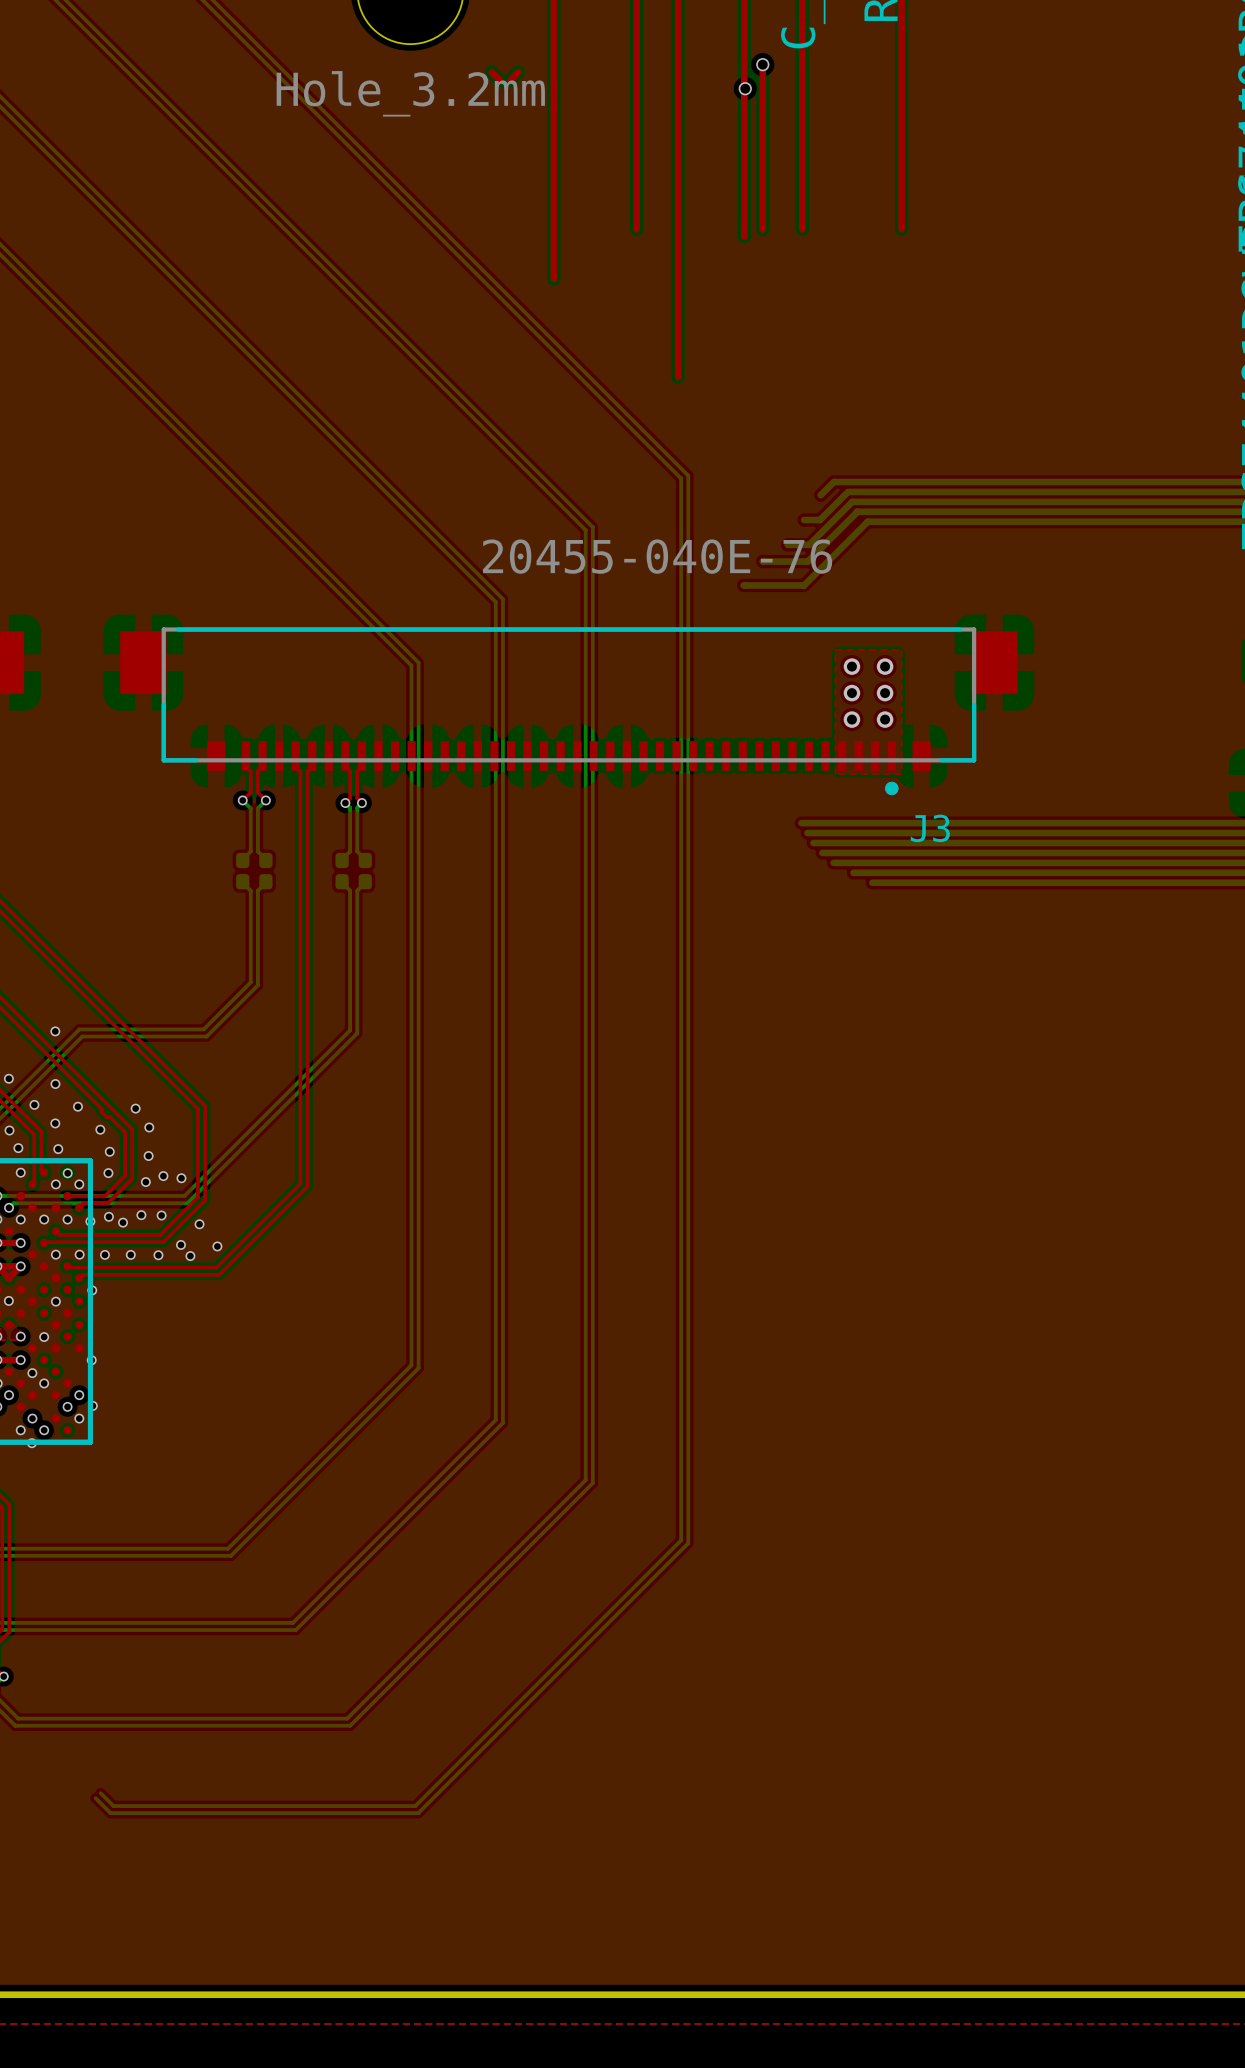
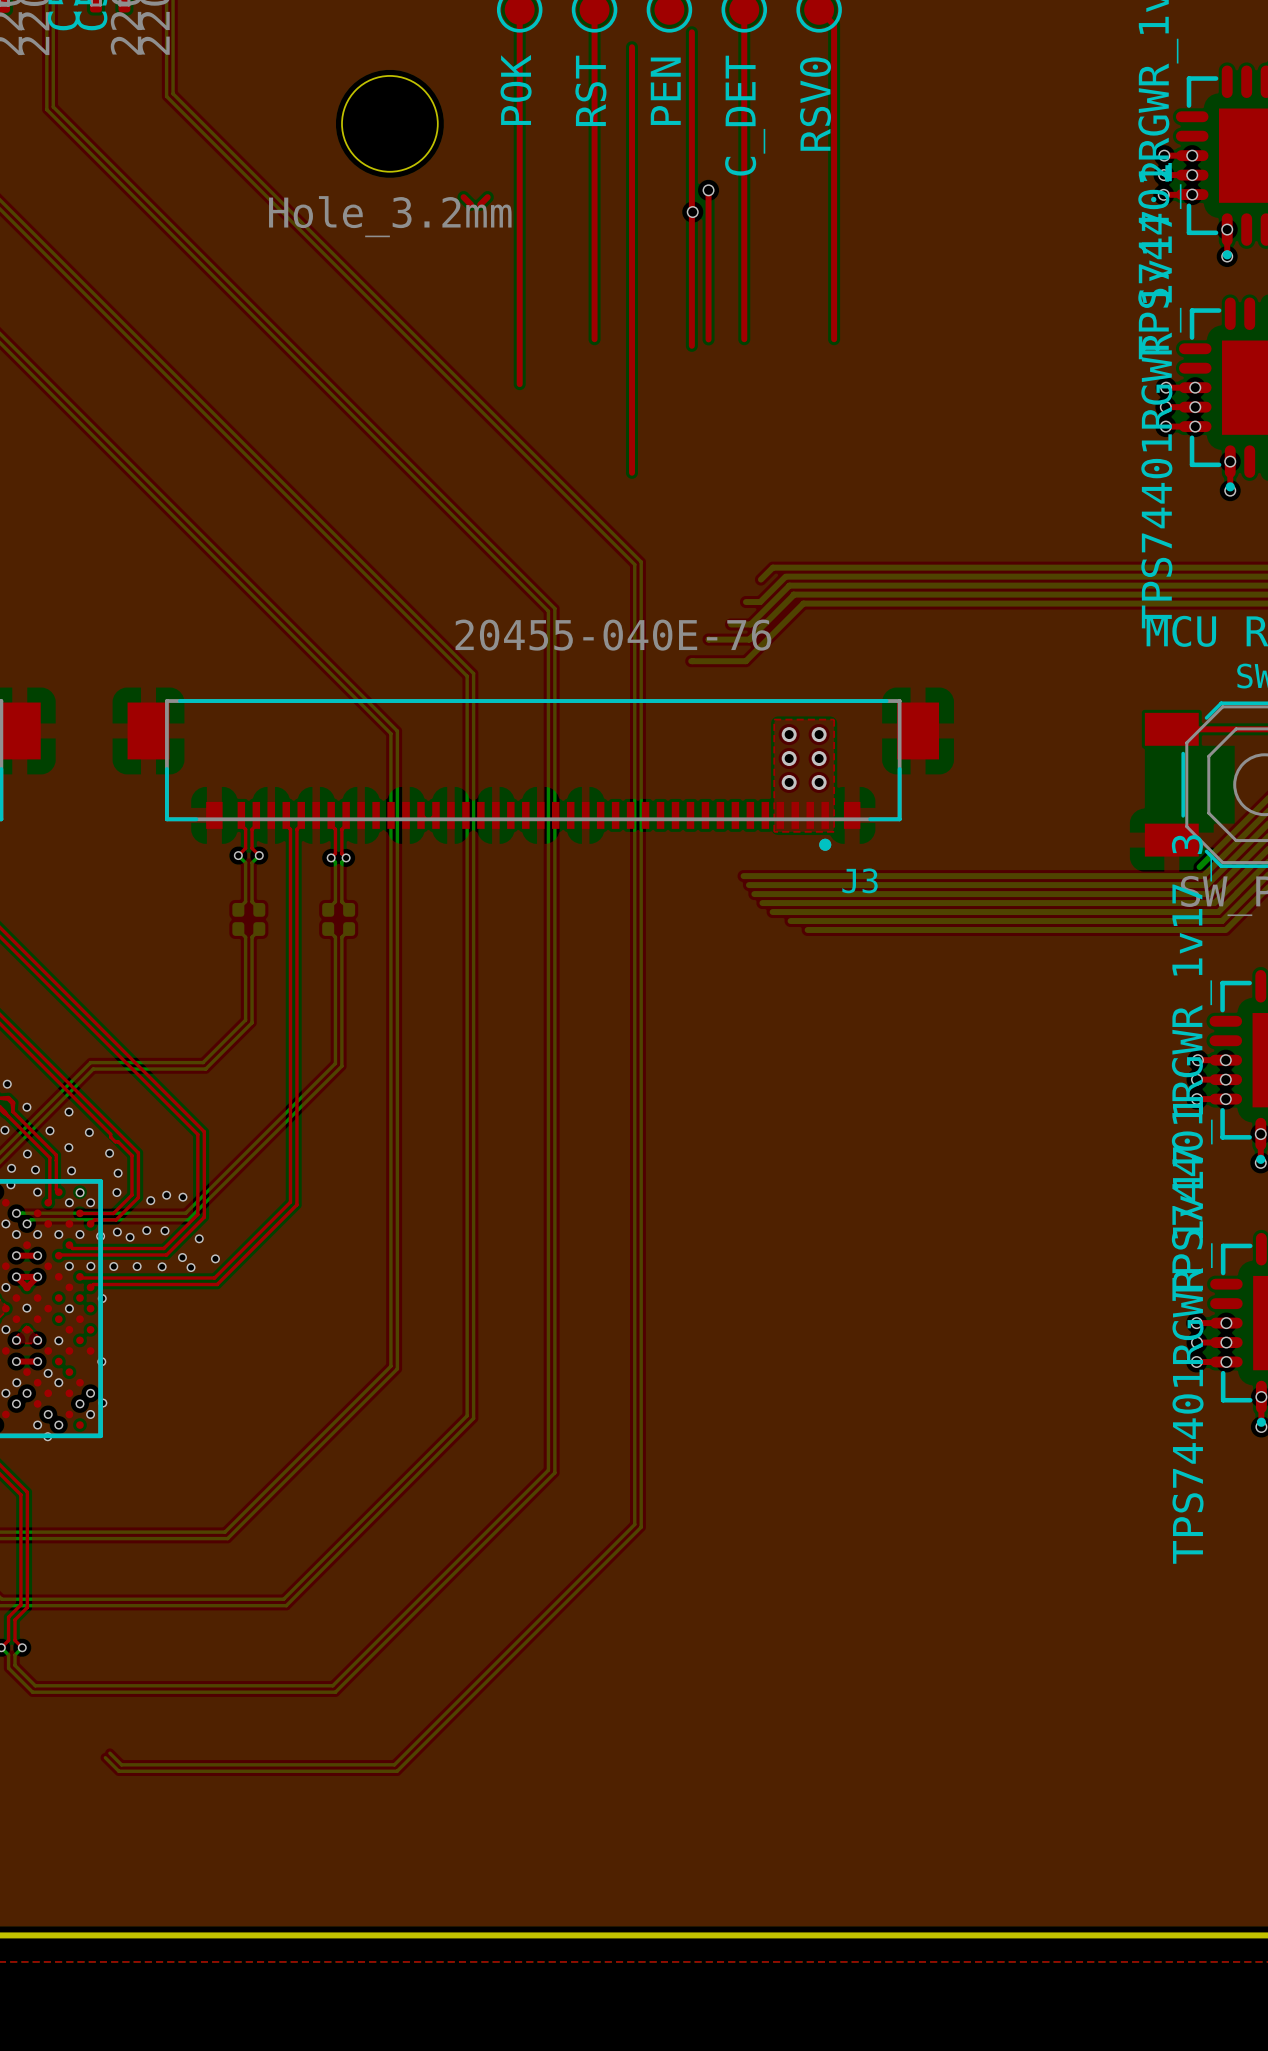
via: (55, 1031) -> none
via: (135, 1108) -> none
via: (149, 1127) -> none
via: (148, 1156) -> none

